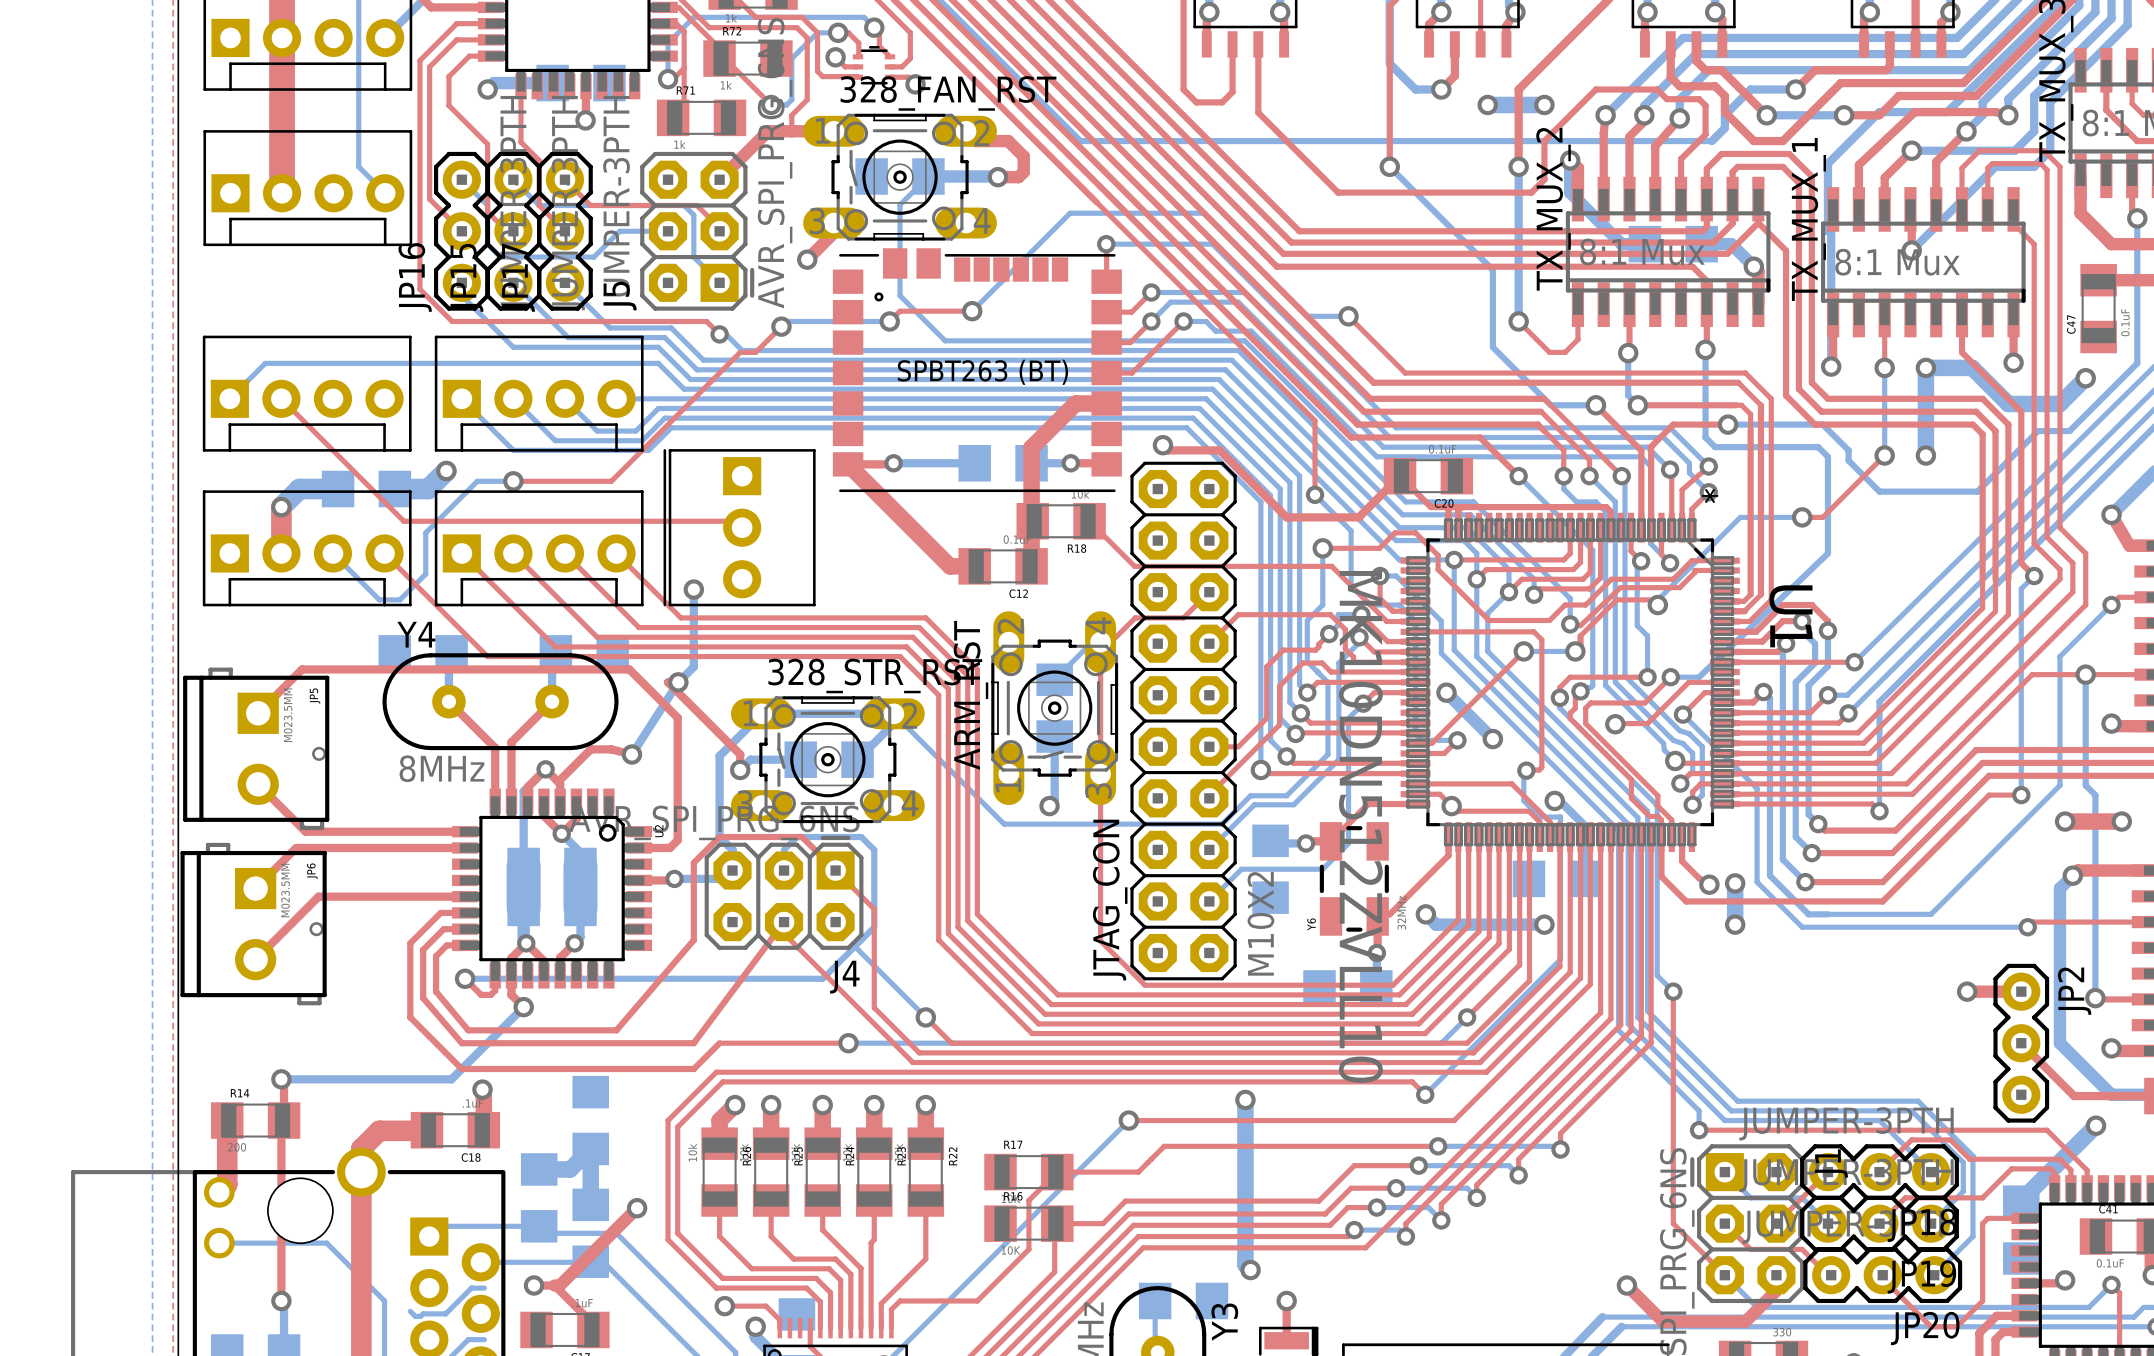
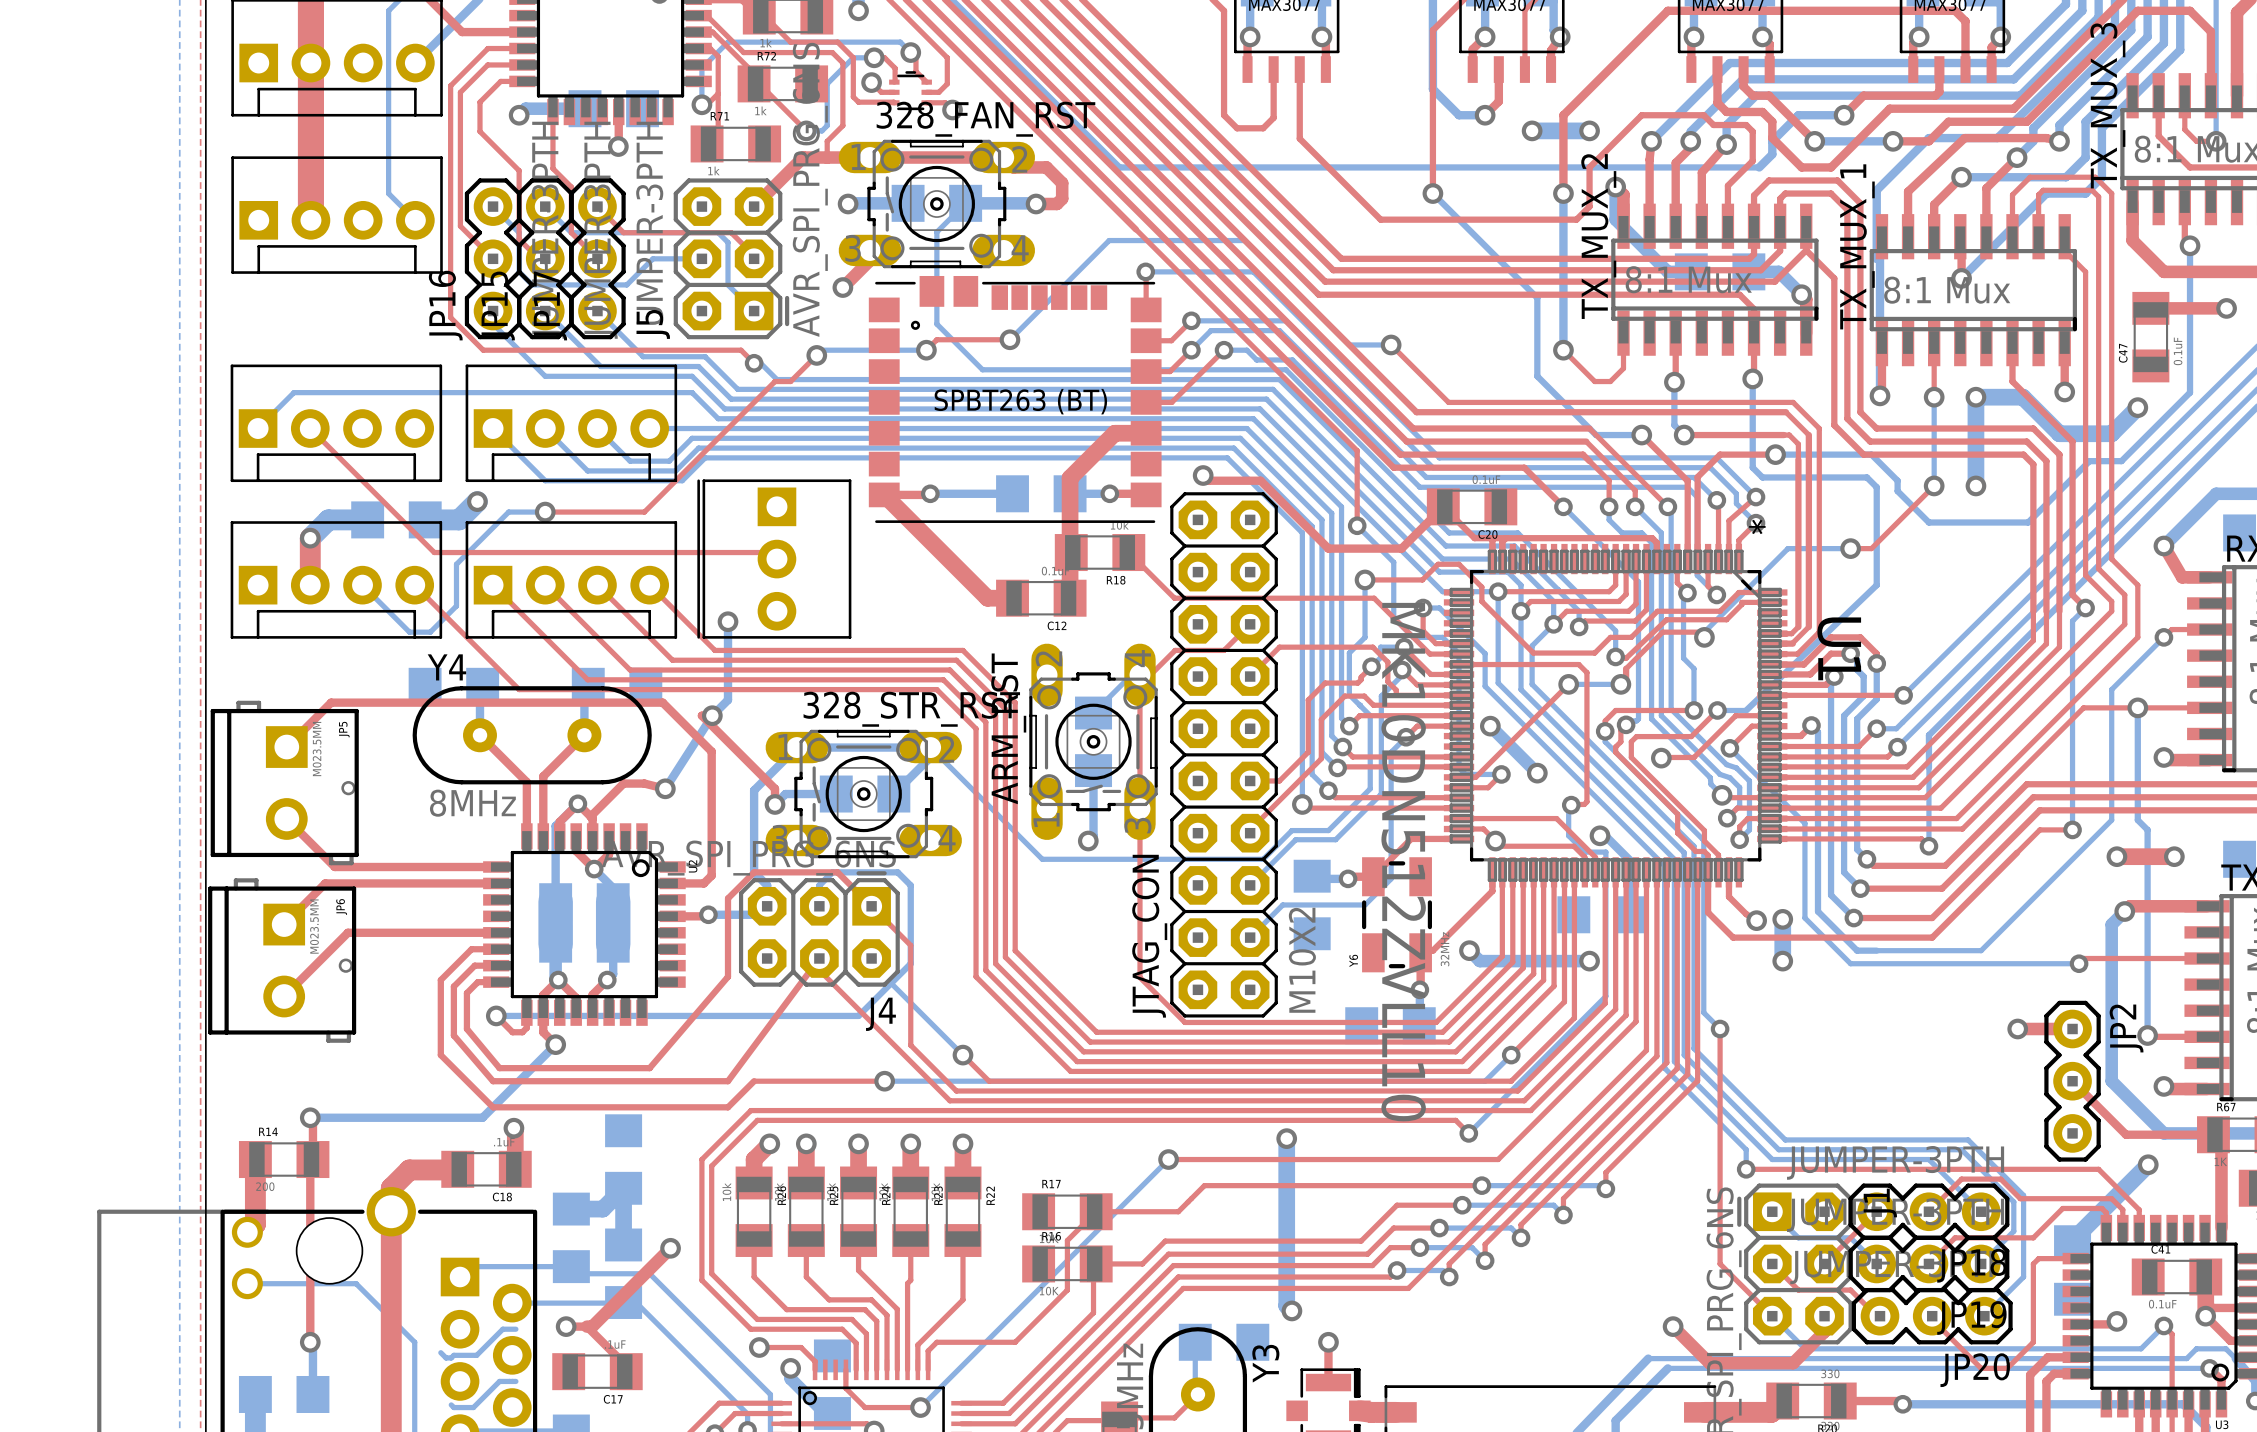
top track: none -> (870, 157) (1003, 157)
bottom track: none -> (908, 203) (848, 203)
via: none -> (848, 203)

